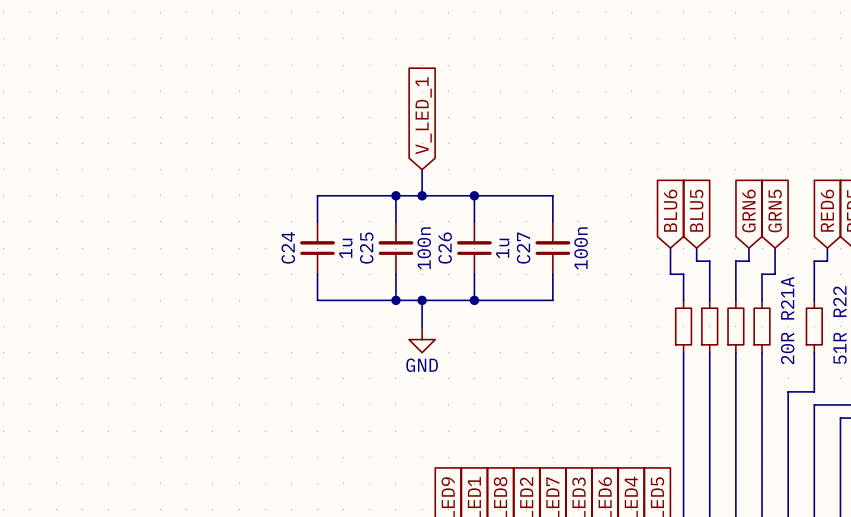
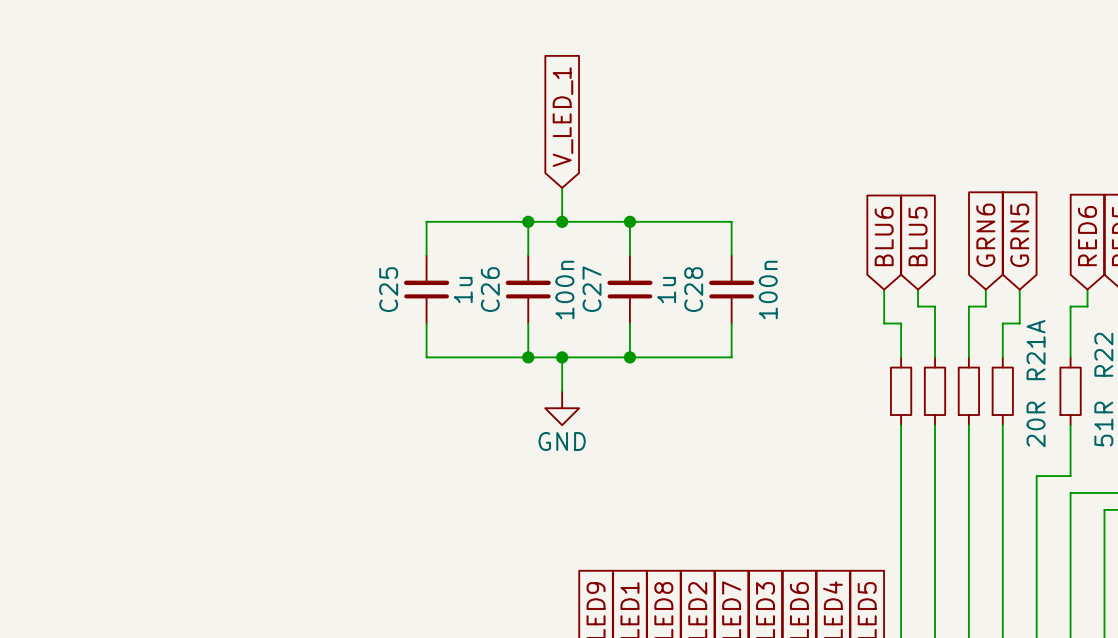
C24 name: C24 (288, 247) -> C25 (388, 289)
C25 name: C25 (366, 248) -> C26 (490, 289)
C26 name: C26 (445, 248) -> C27 (592, 289)
C27 name: C27 (523, 248) -> C28 (693, 289)

